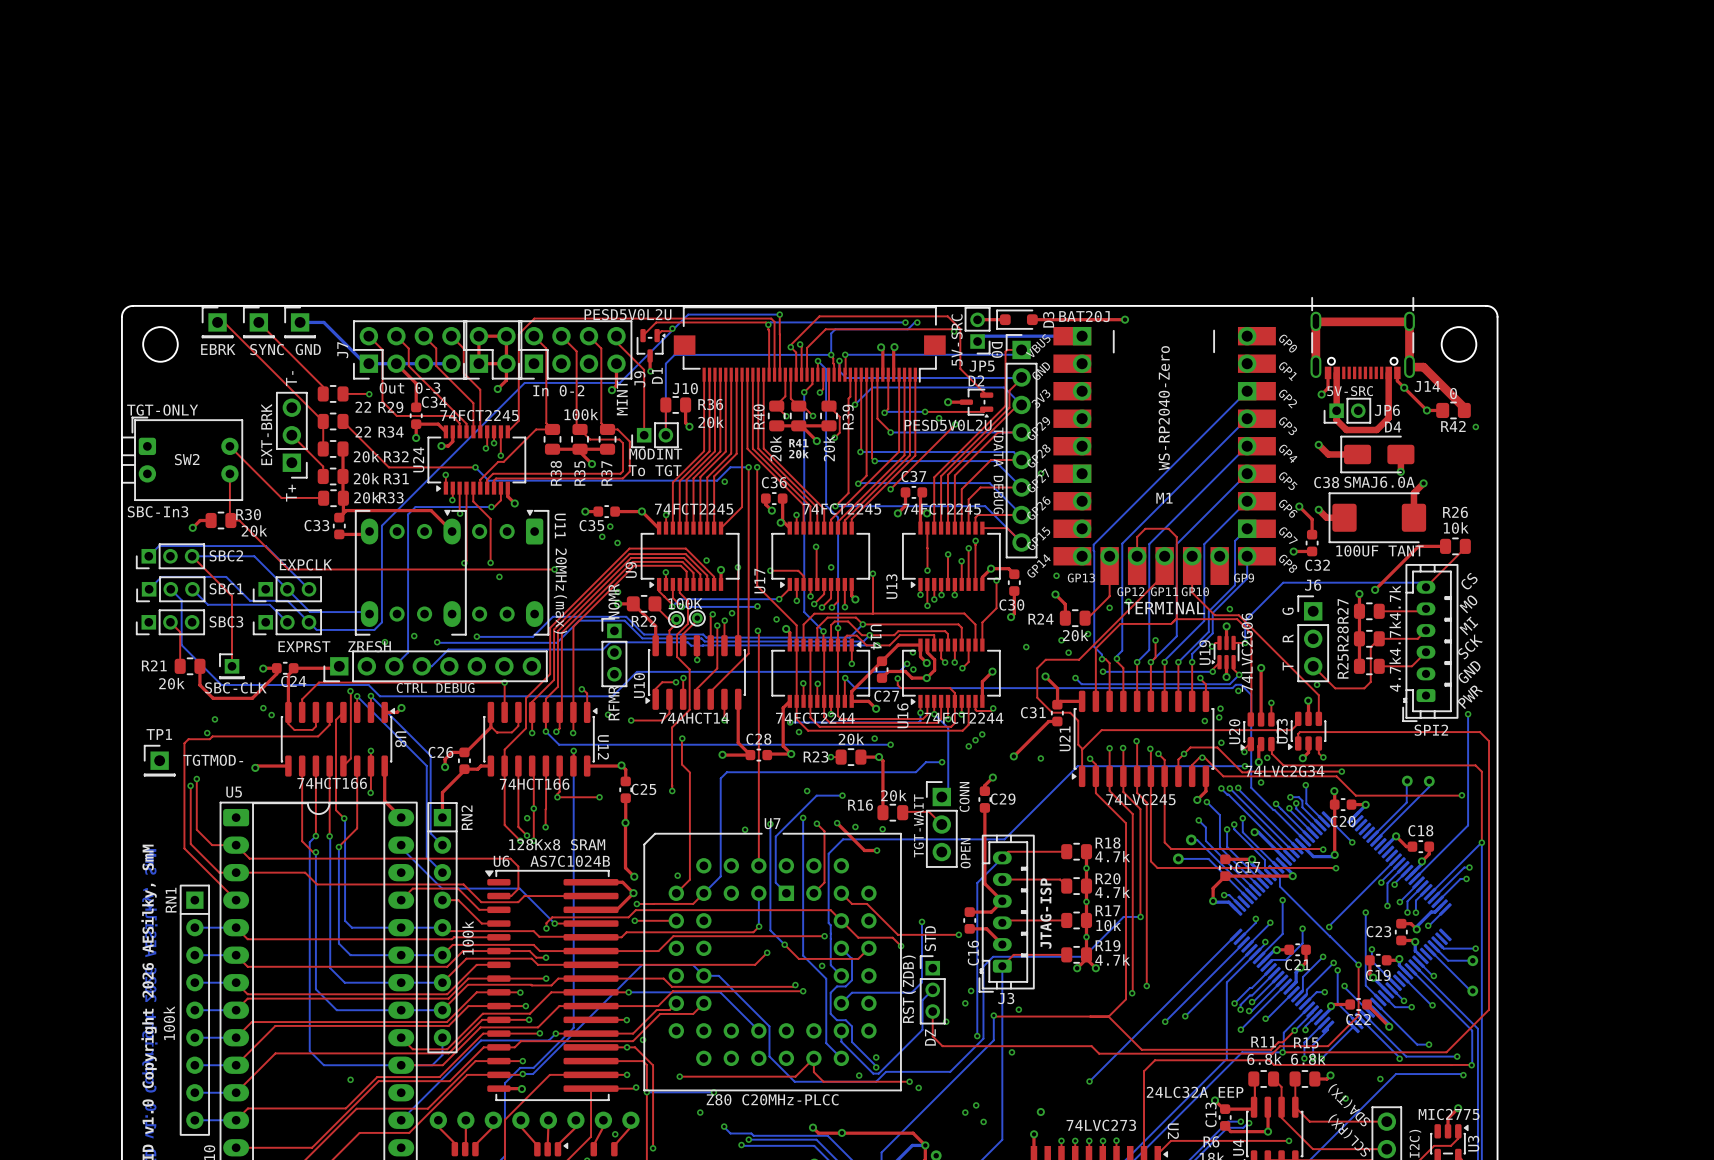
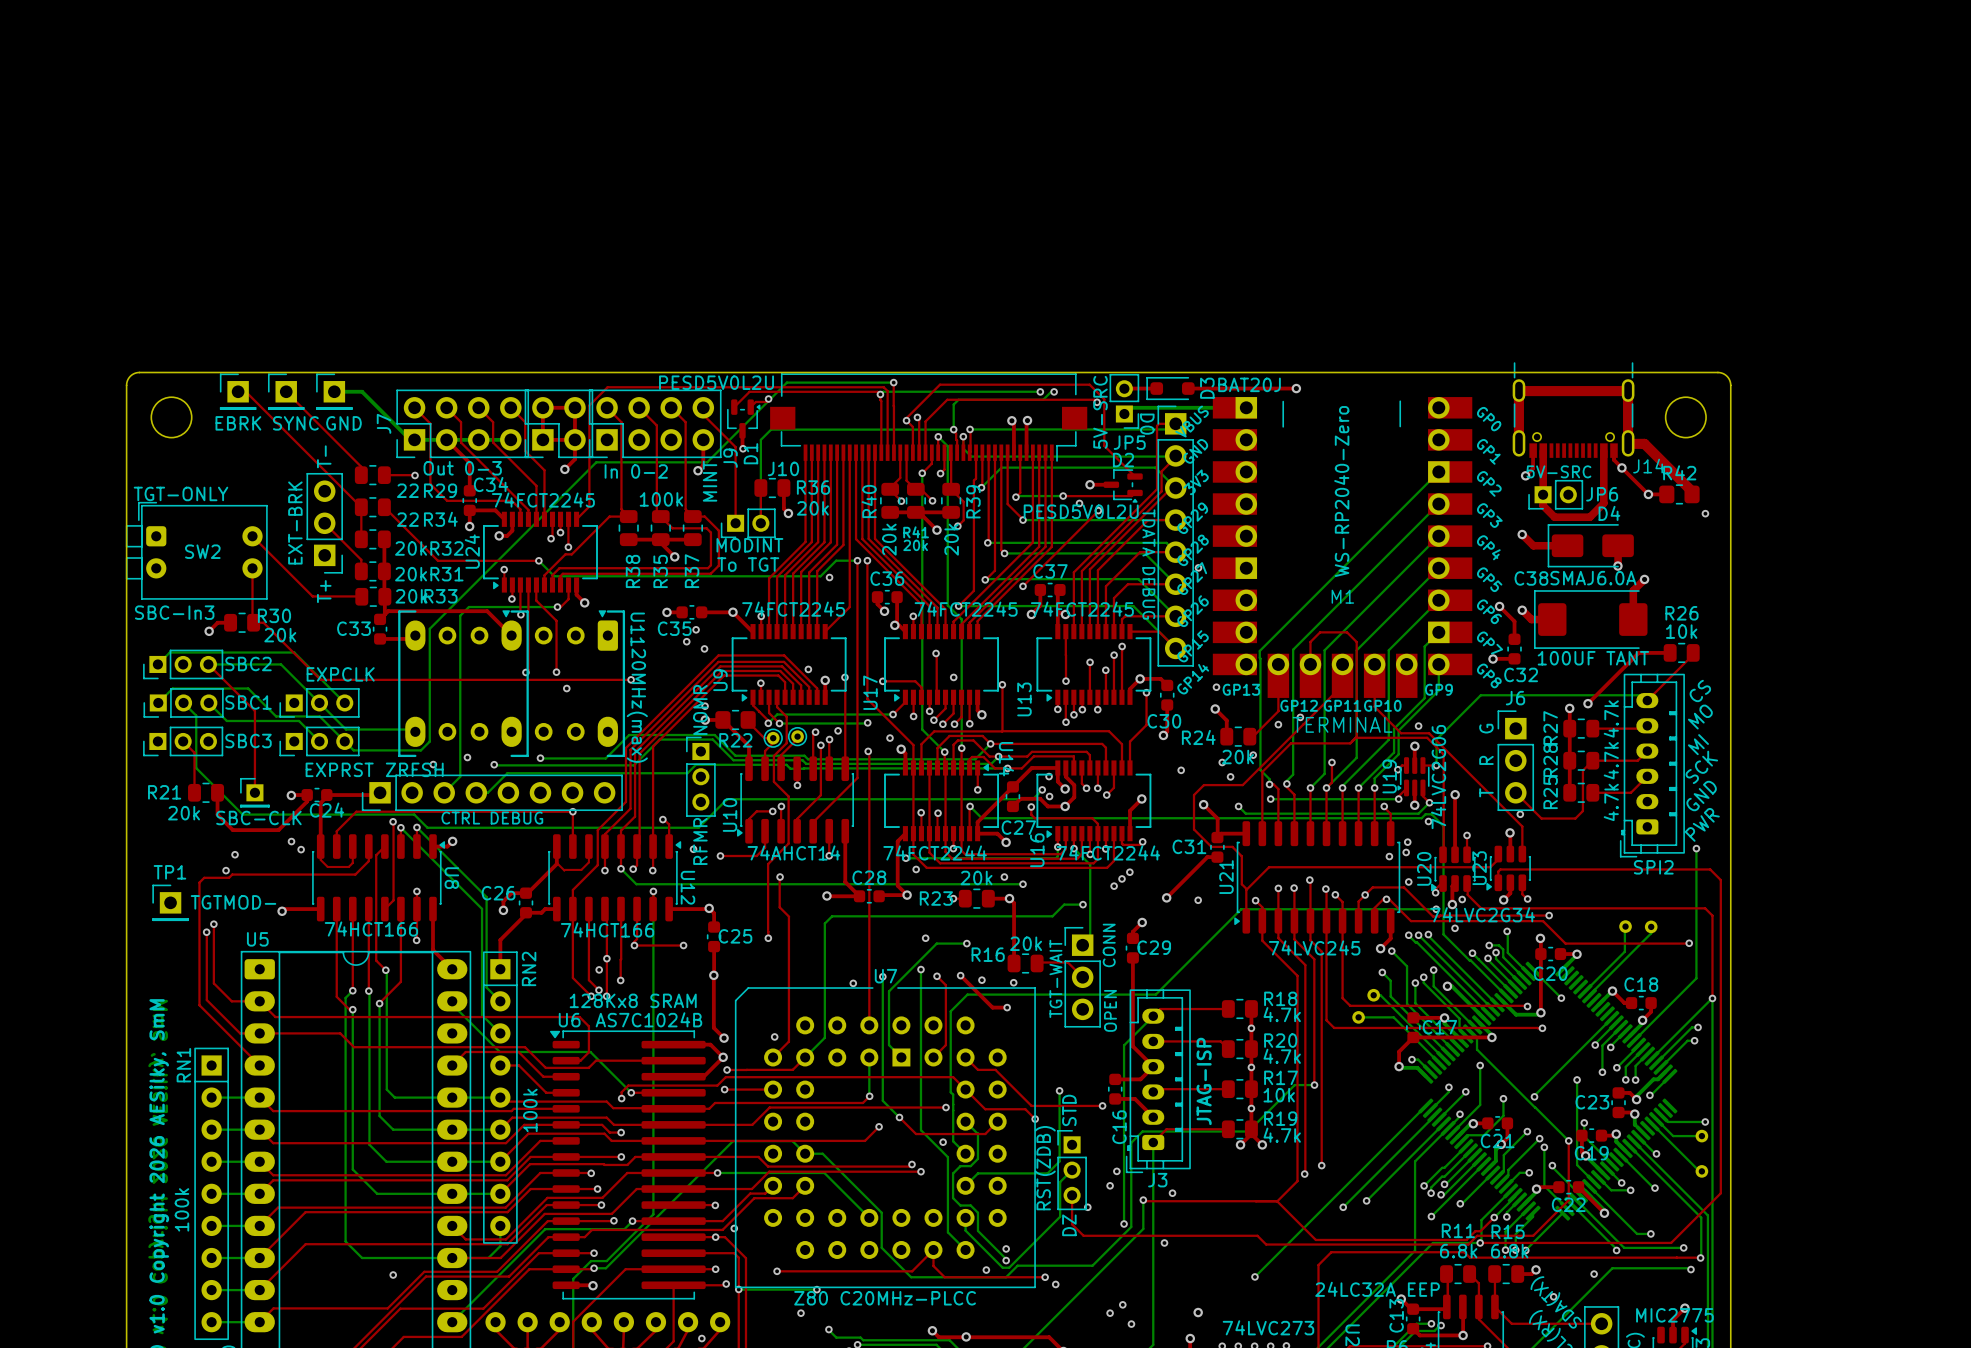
R42 value: 0 (1453, 393) -> none
R42 name position: R42 (1453, 426) -> R42 (1679, 472)
R22 value: 100K (685, 603) -> none

